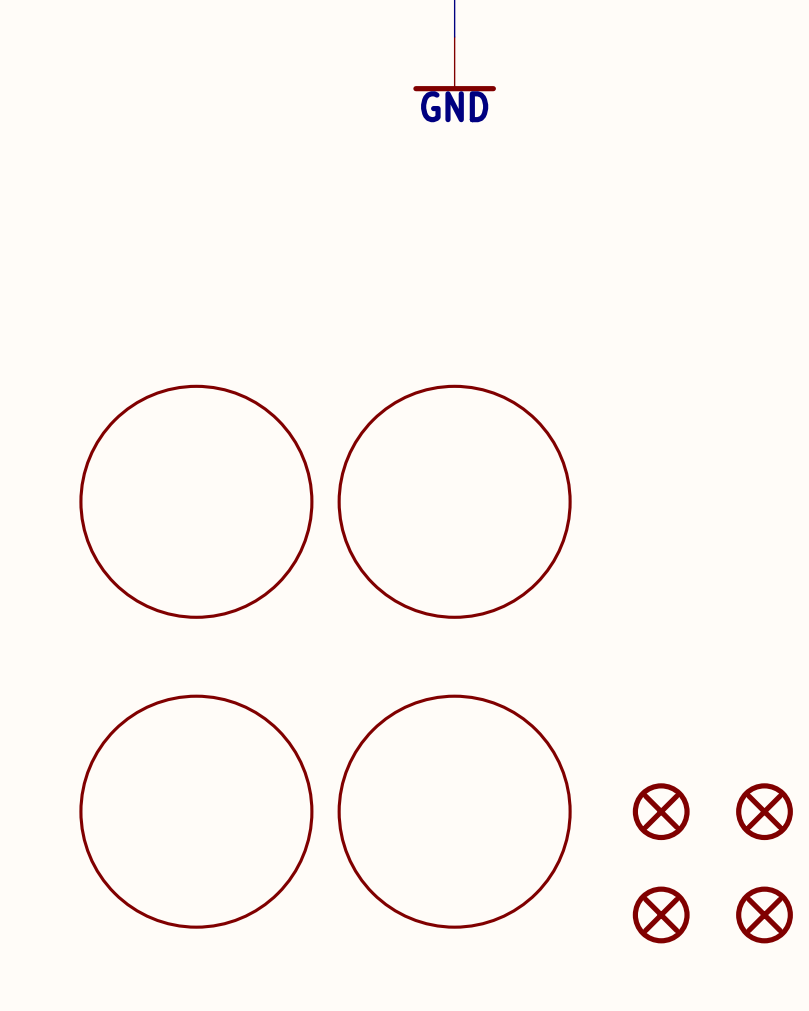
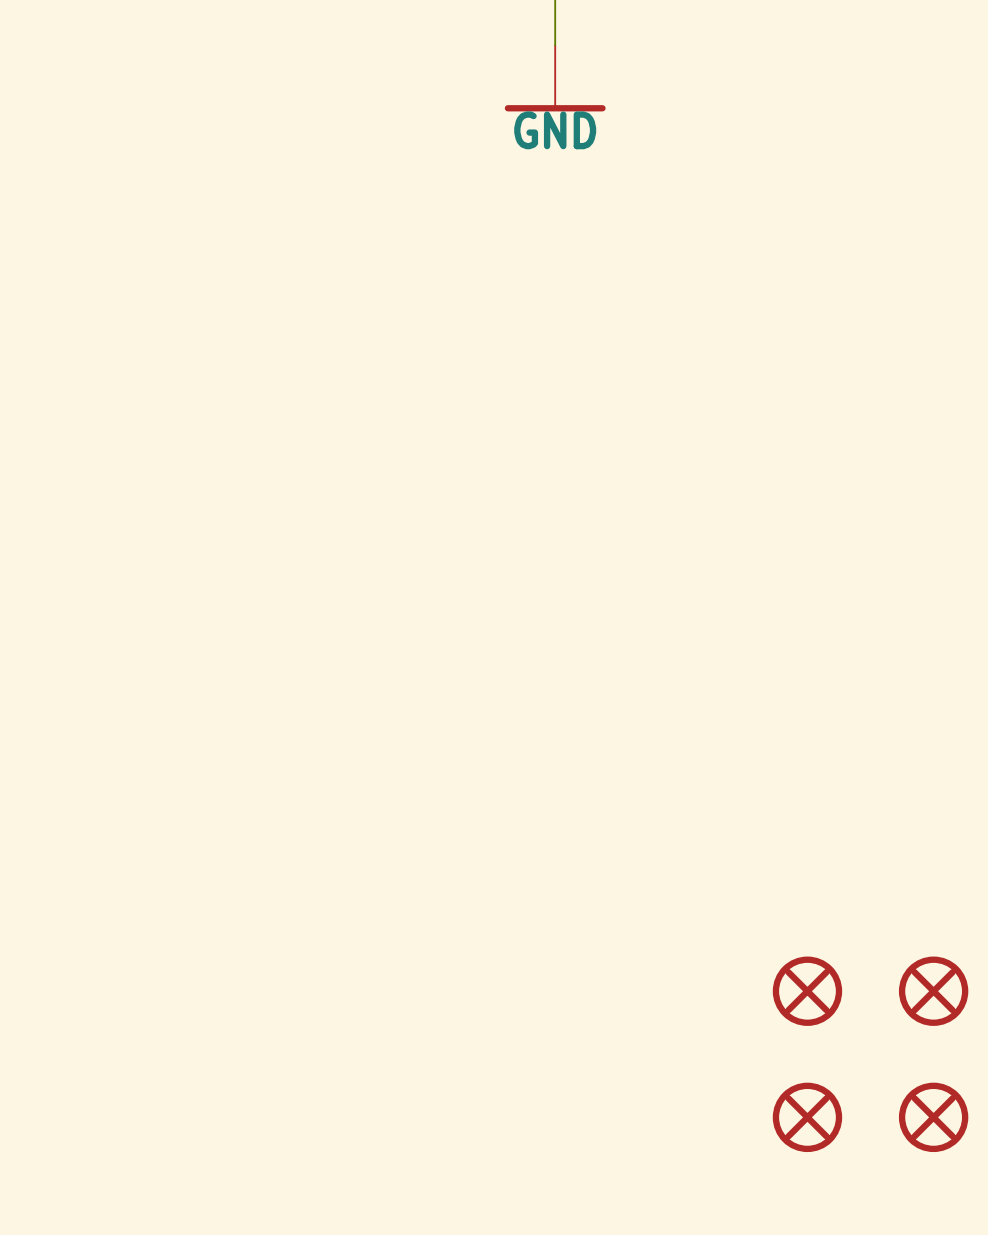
part: (196, 501) -> none
part: (454, 501) -> none
part: (196, 811) -> none
part: (454, 811) -> none

